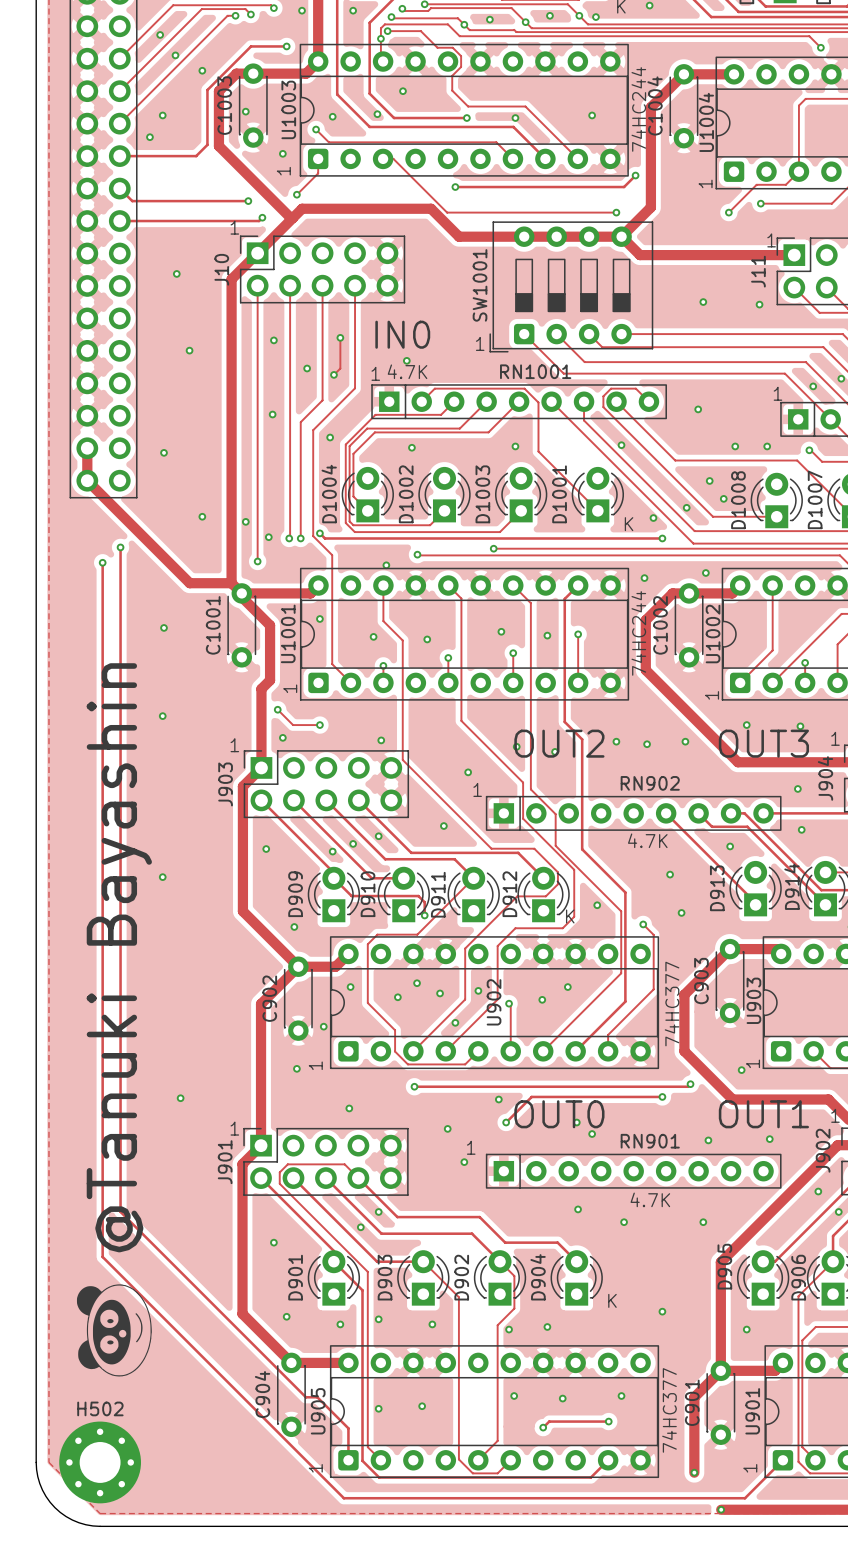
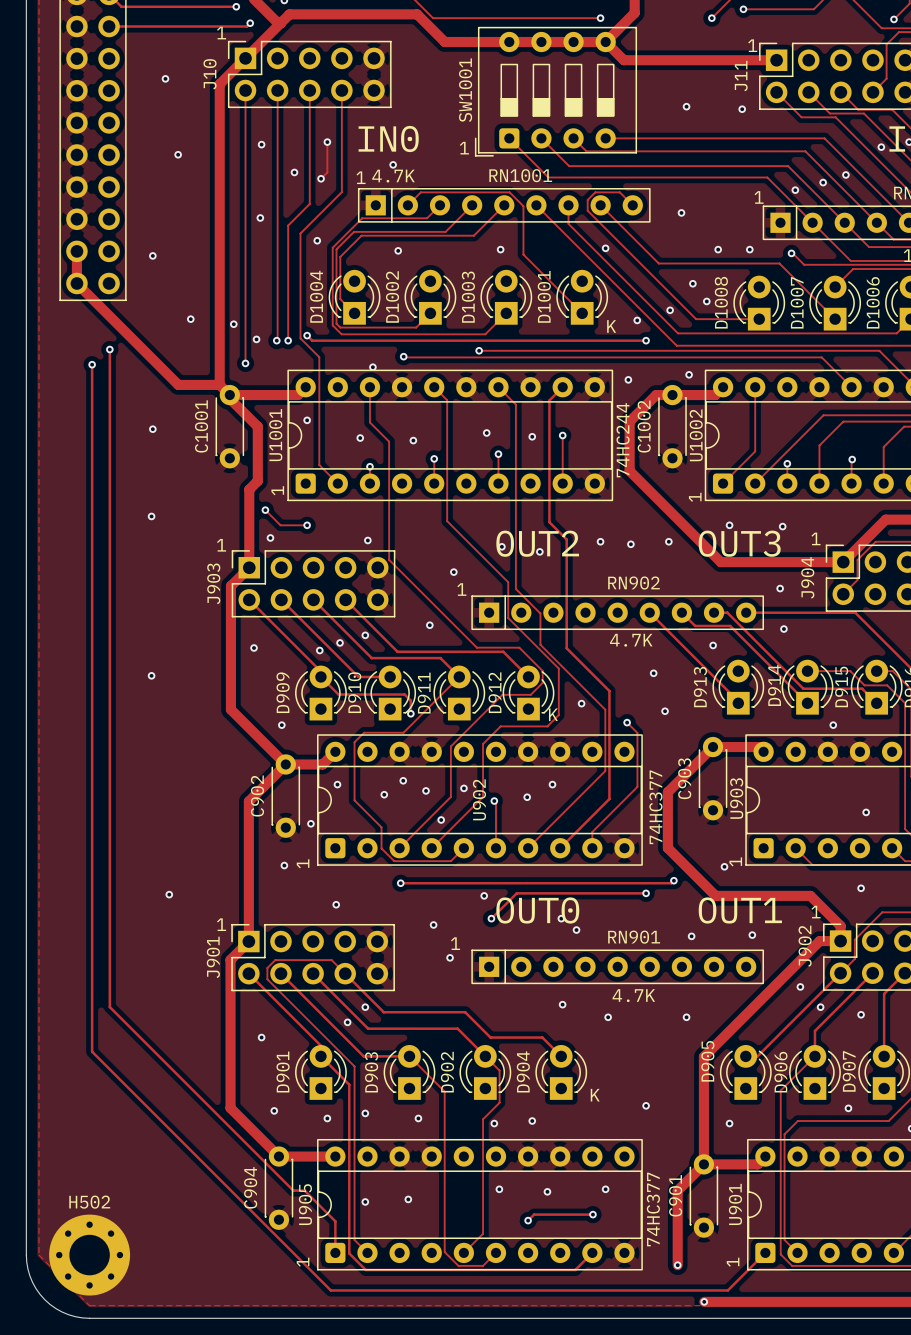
text: @Tanuki Bayashin (119, 957) -> none
drawing: [76, 1284, 152, 1377] -> none

